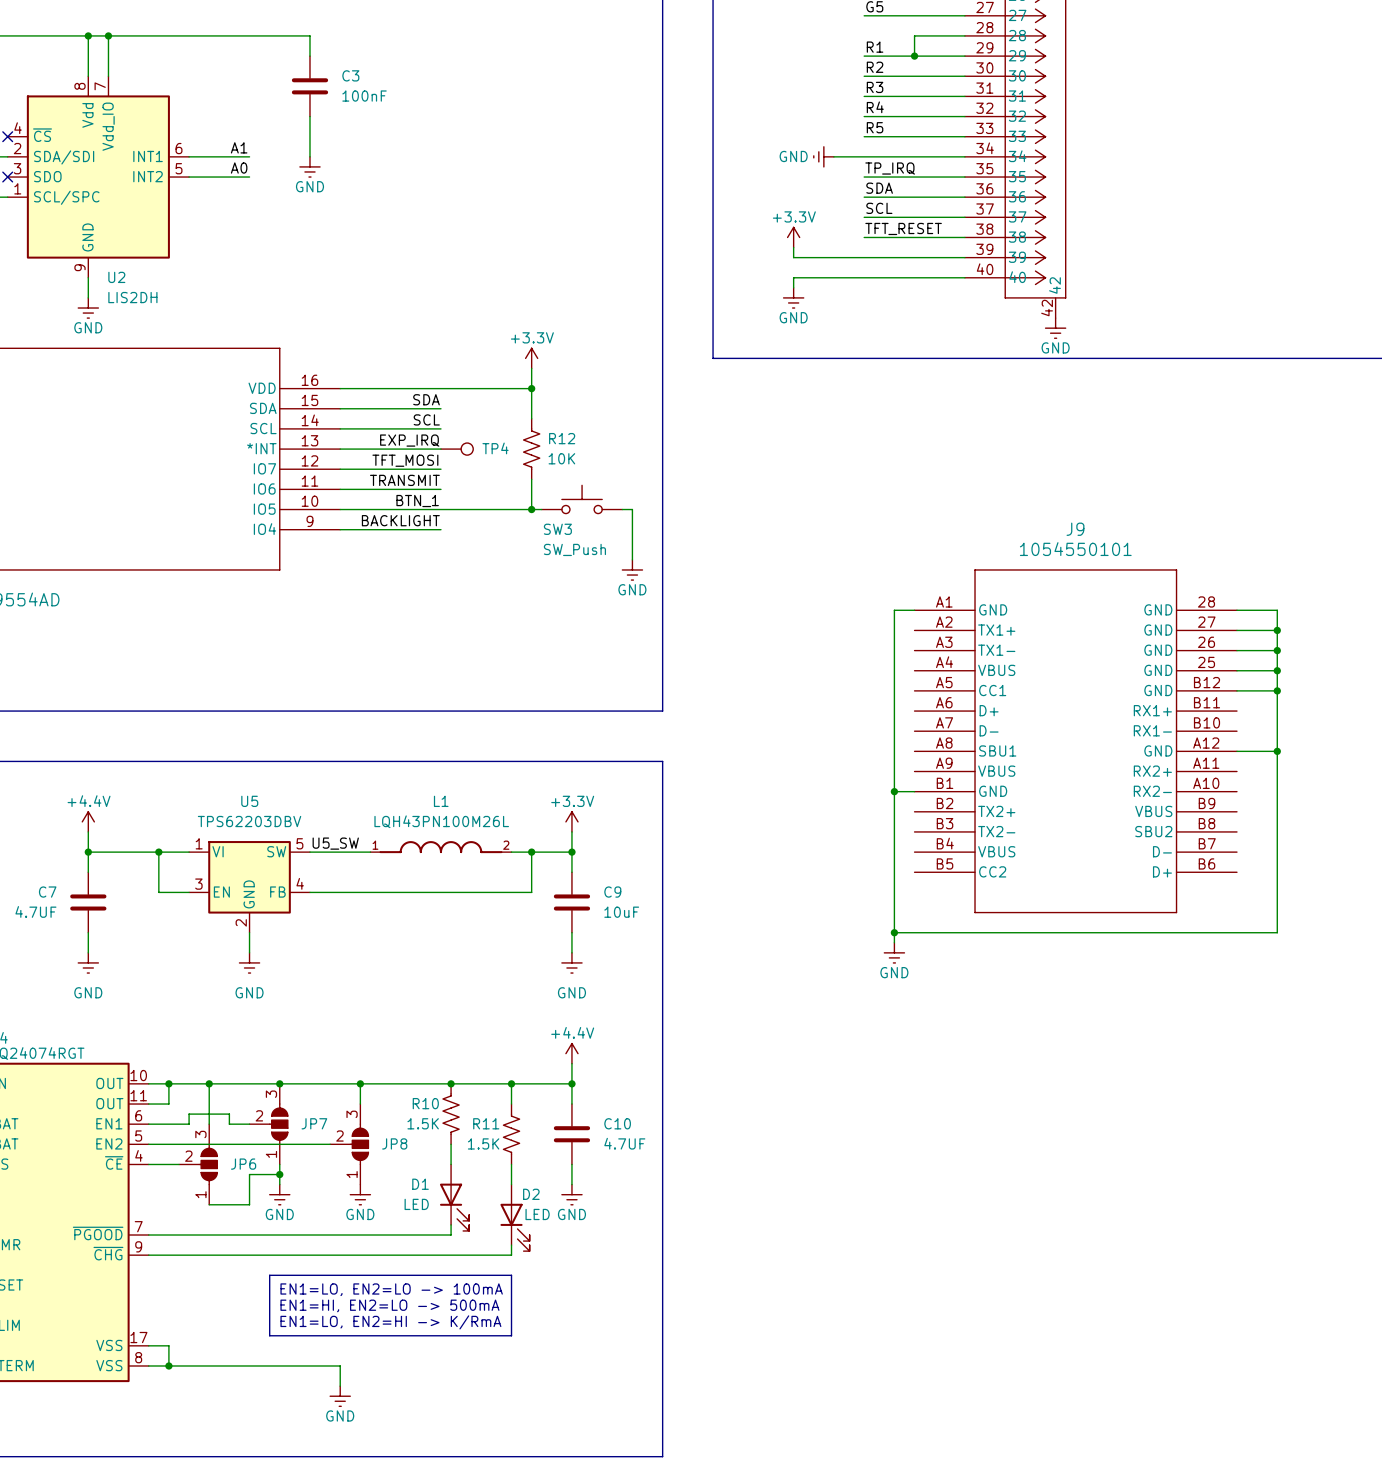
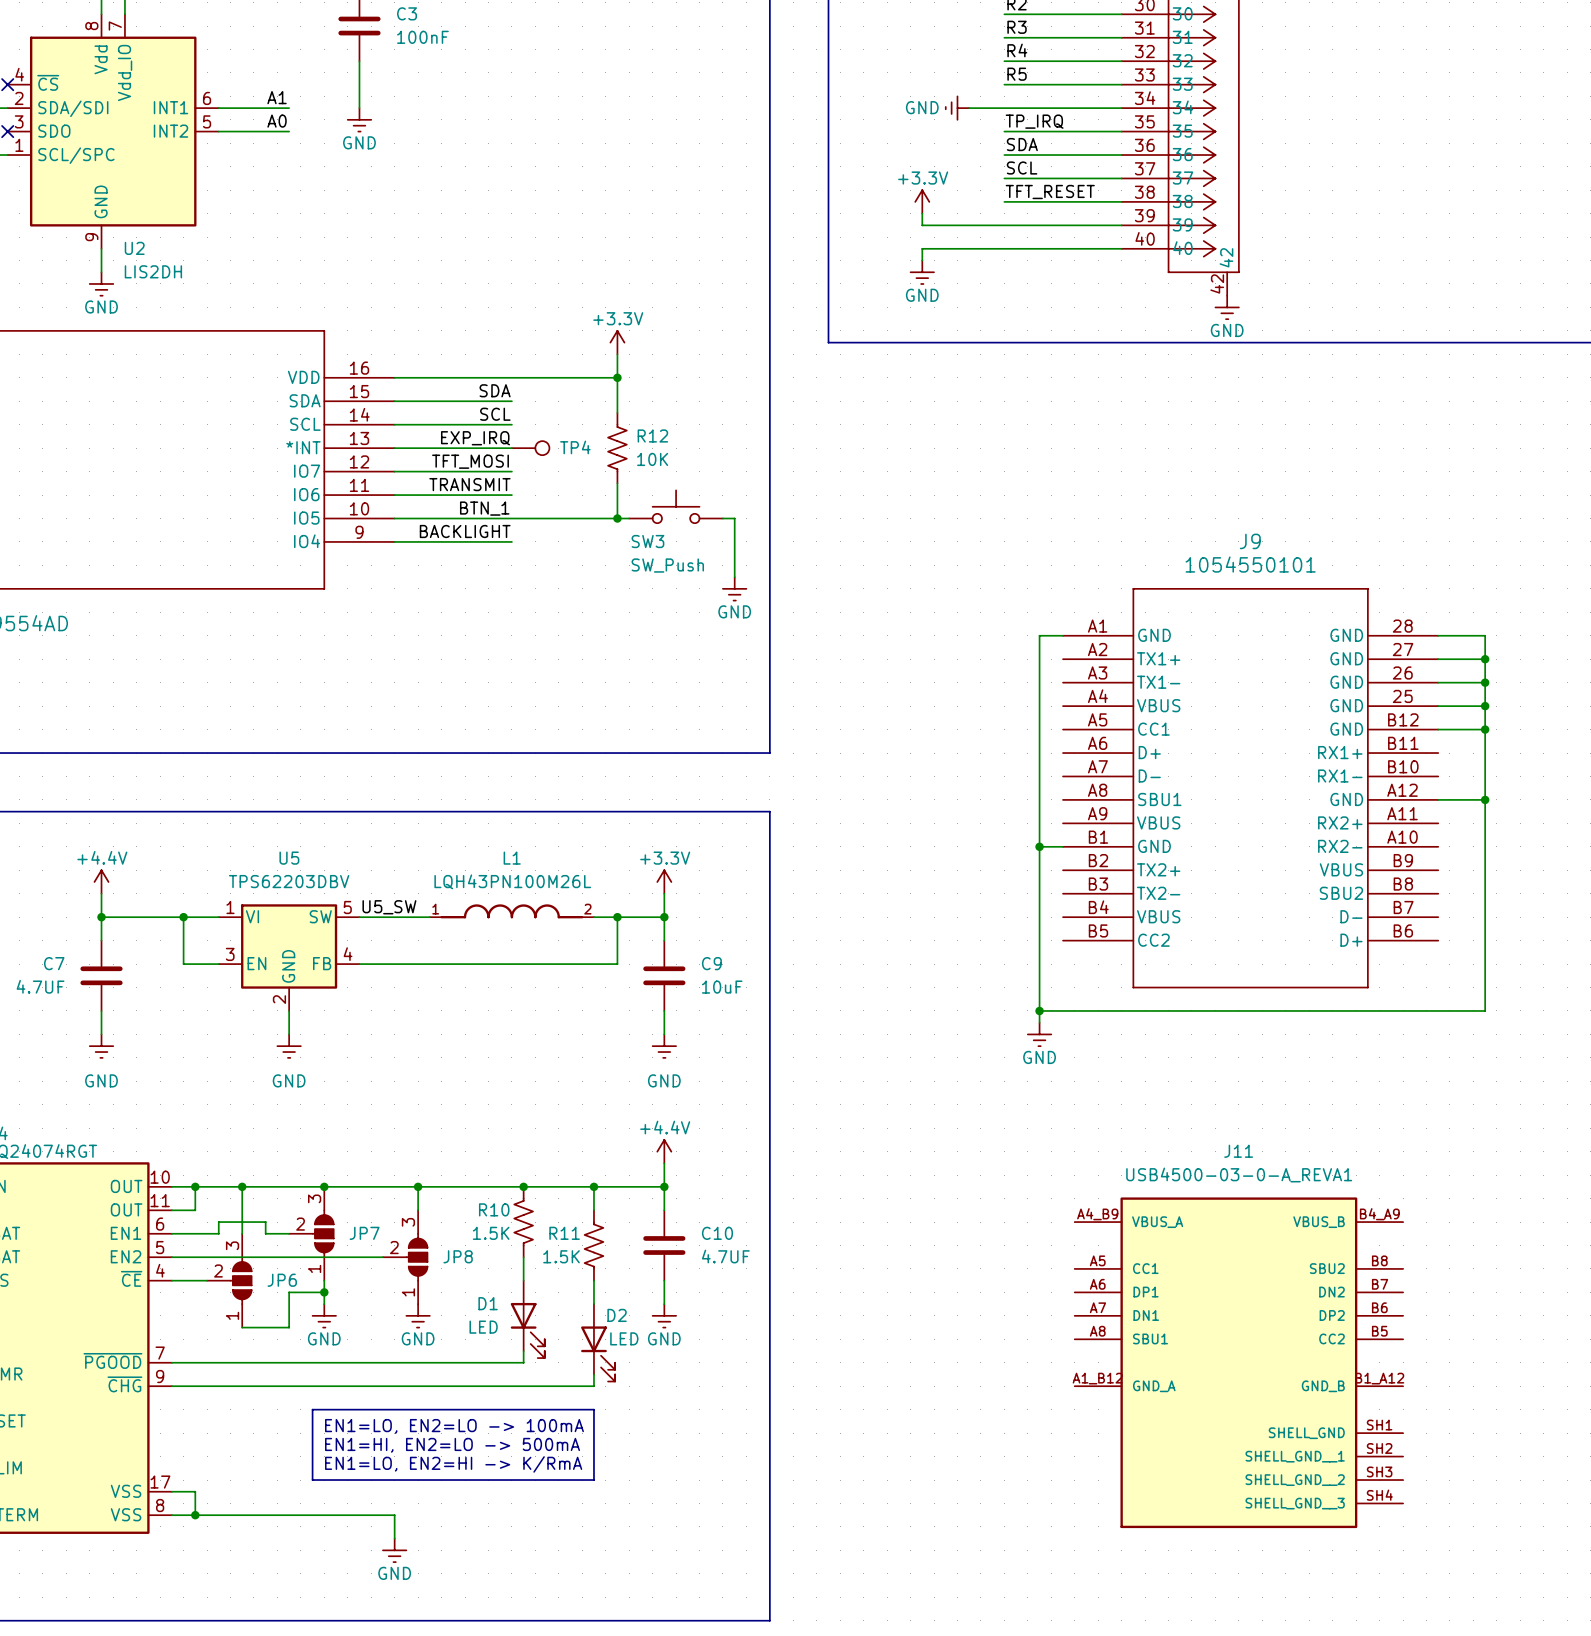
J11: none -> USB4500-03-0-A_REVA1 (1238, 1362)

